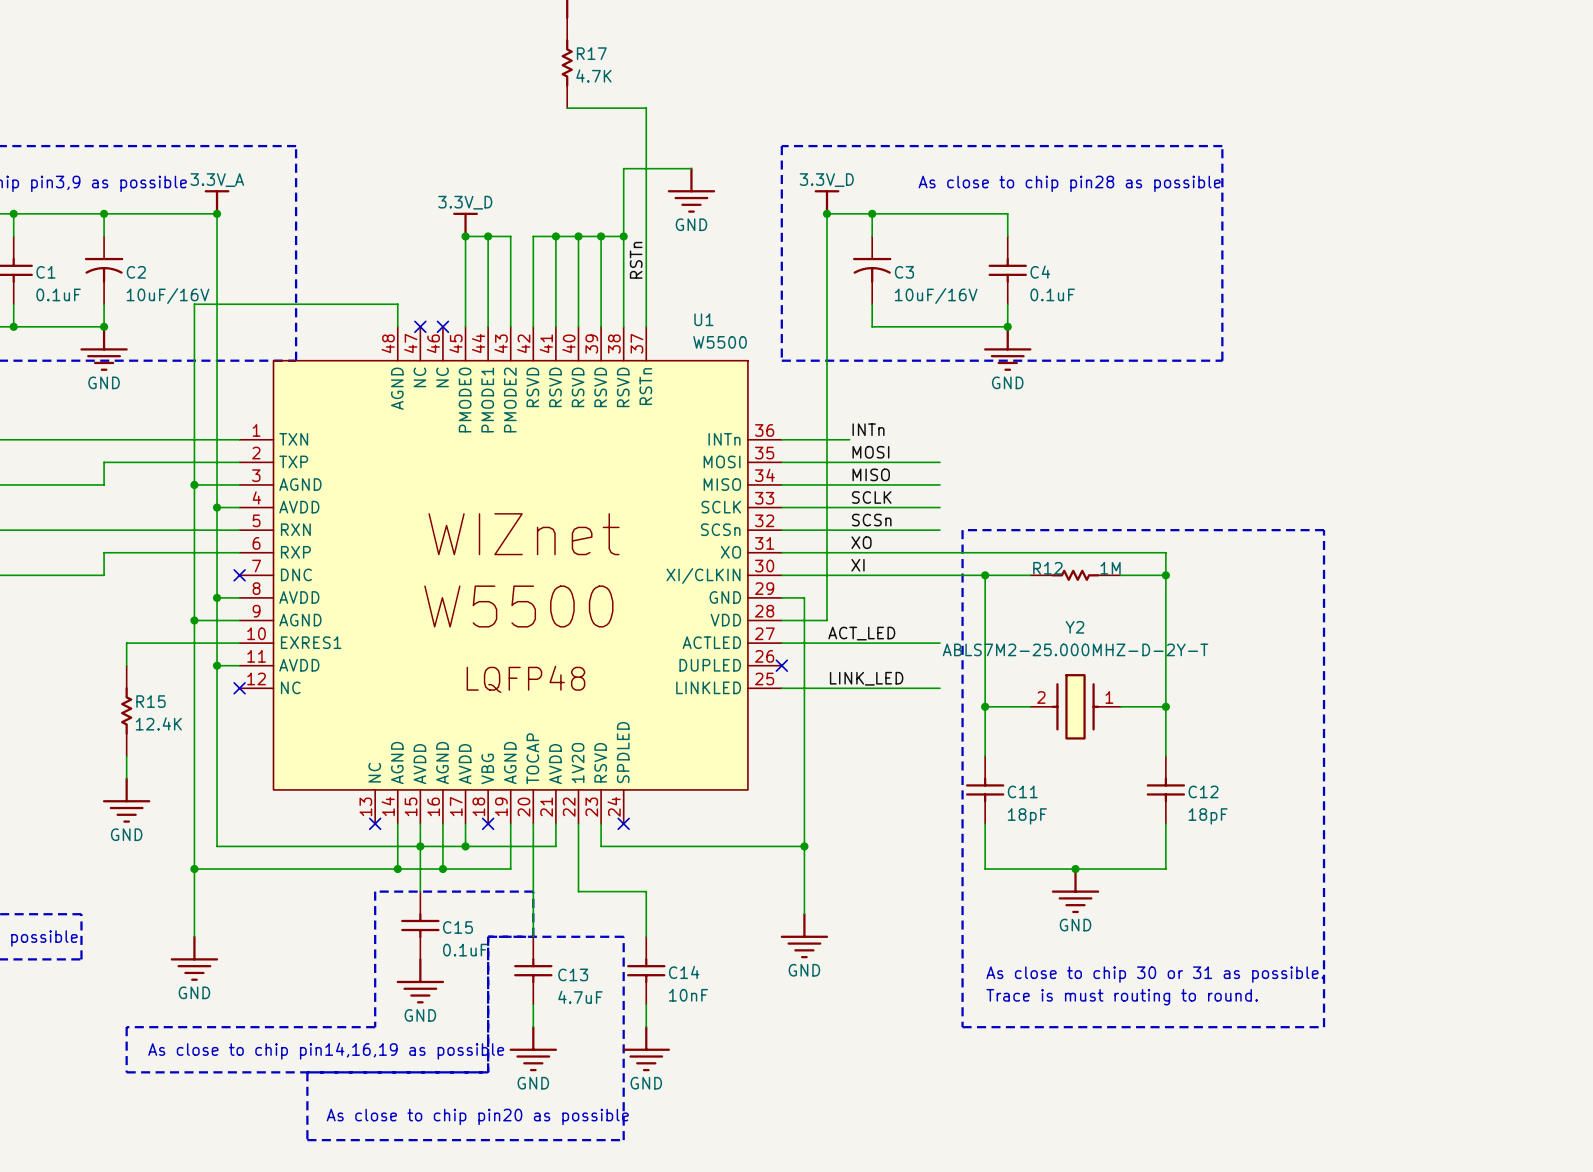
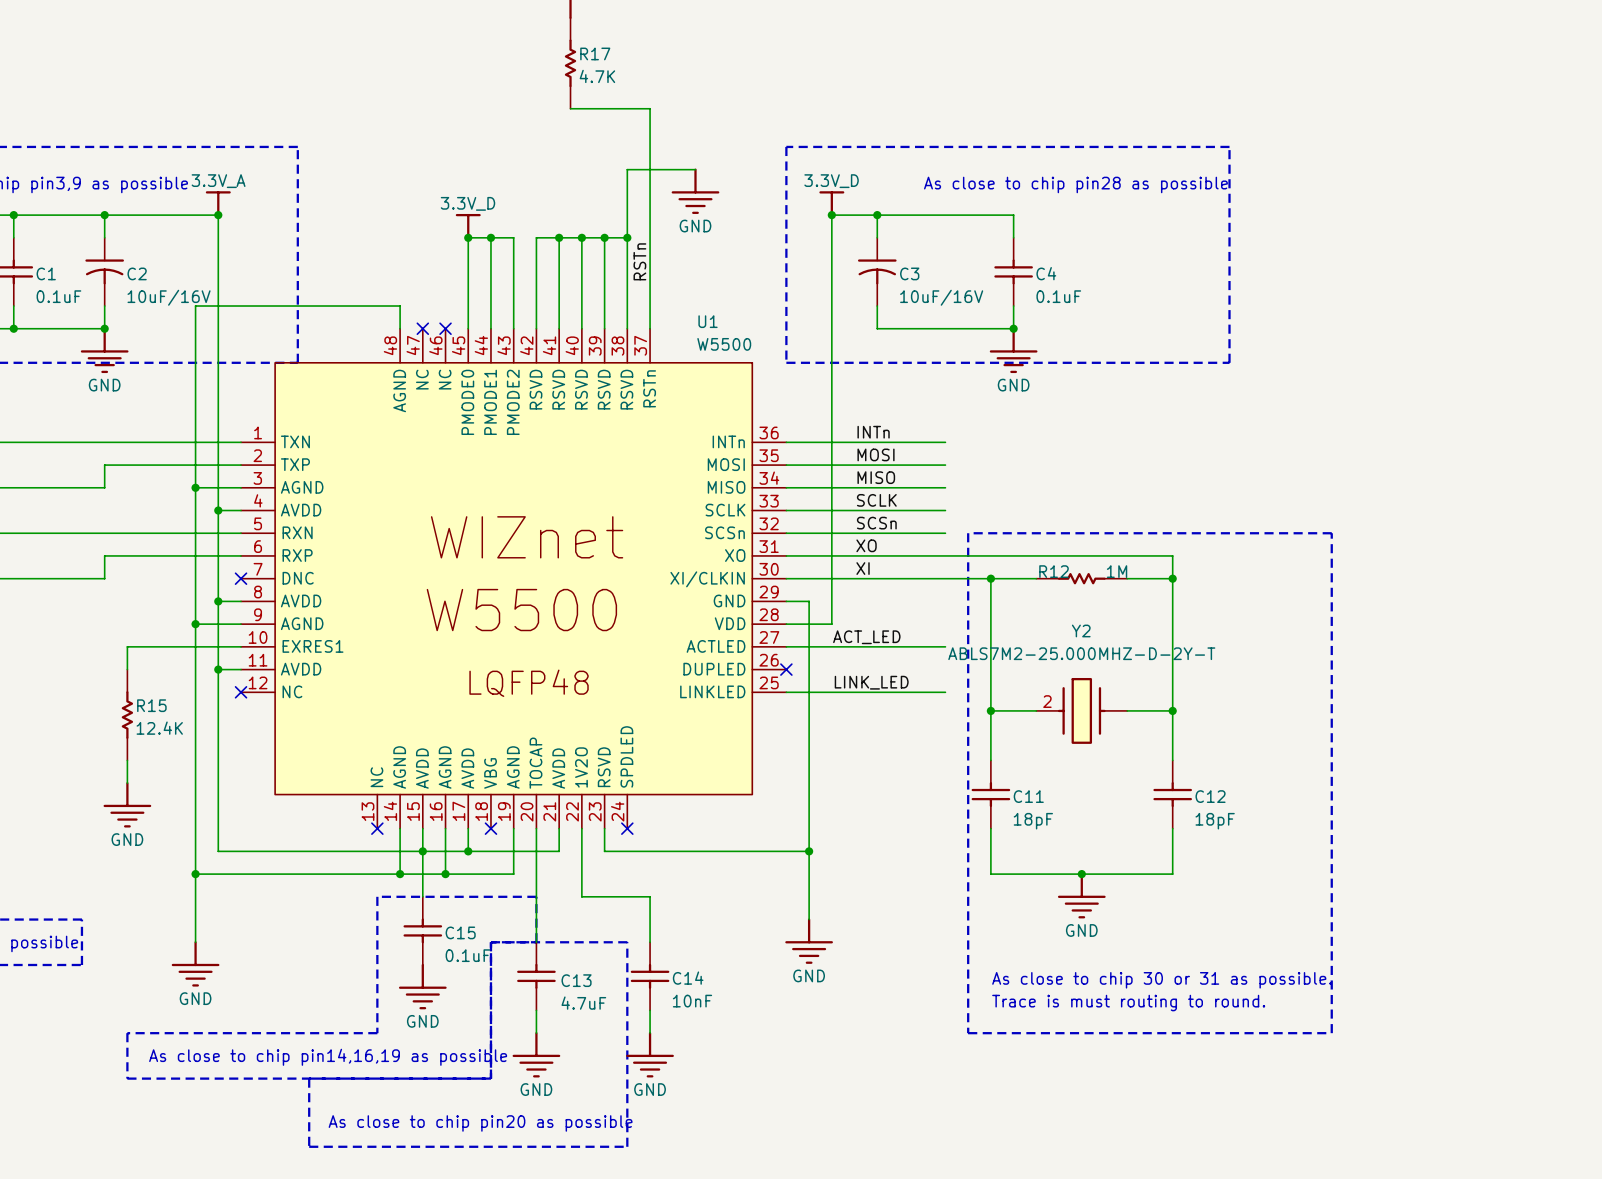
wire: none -> (854, 442) (945, 442)
Y2 pin number: 1 (1109, 697) -> none

